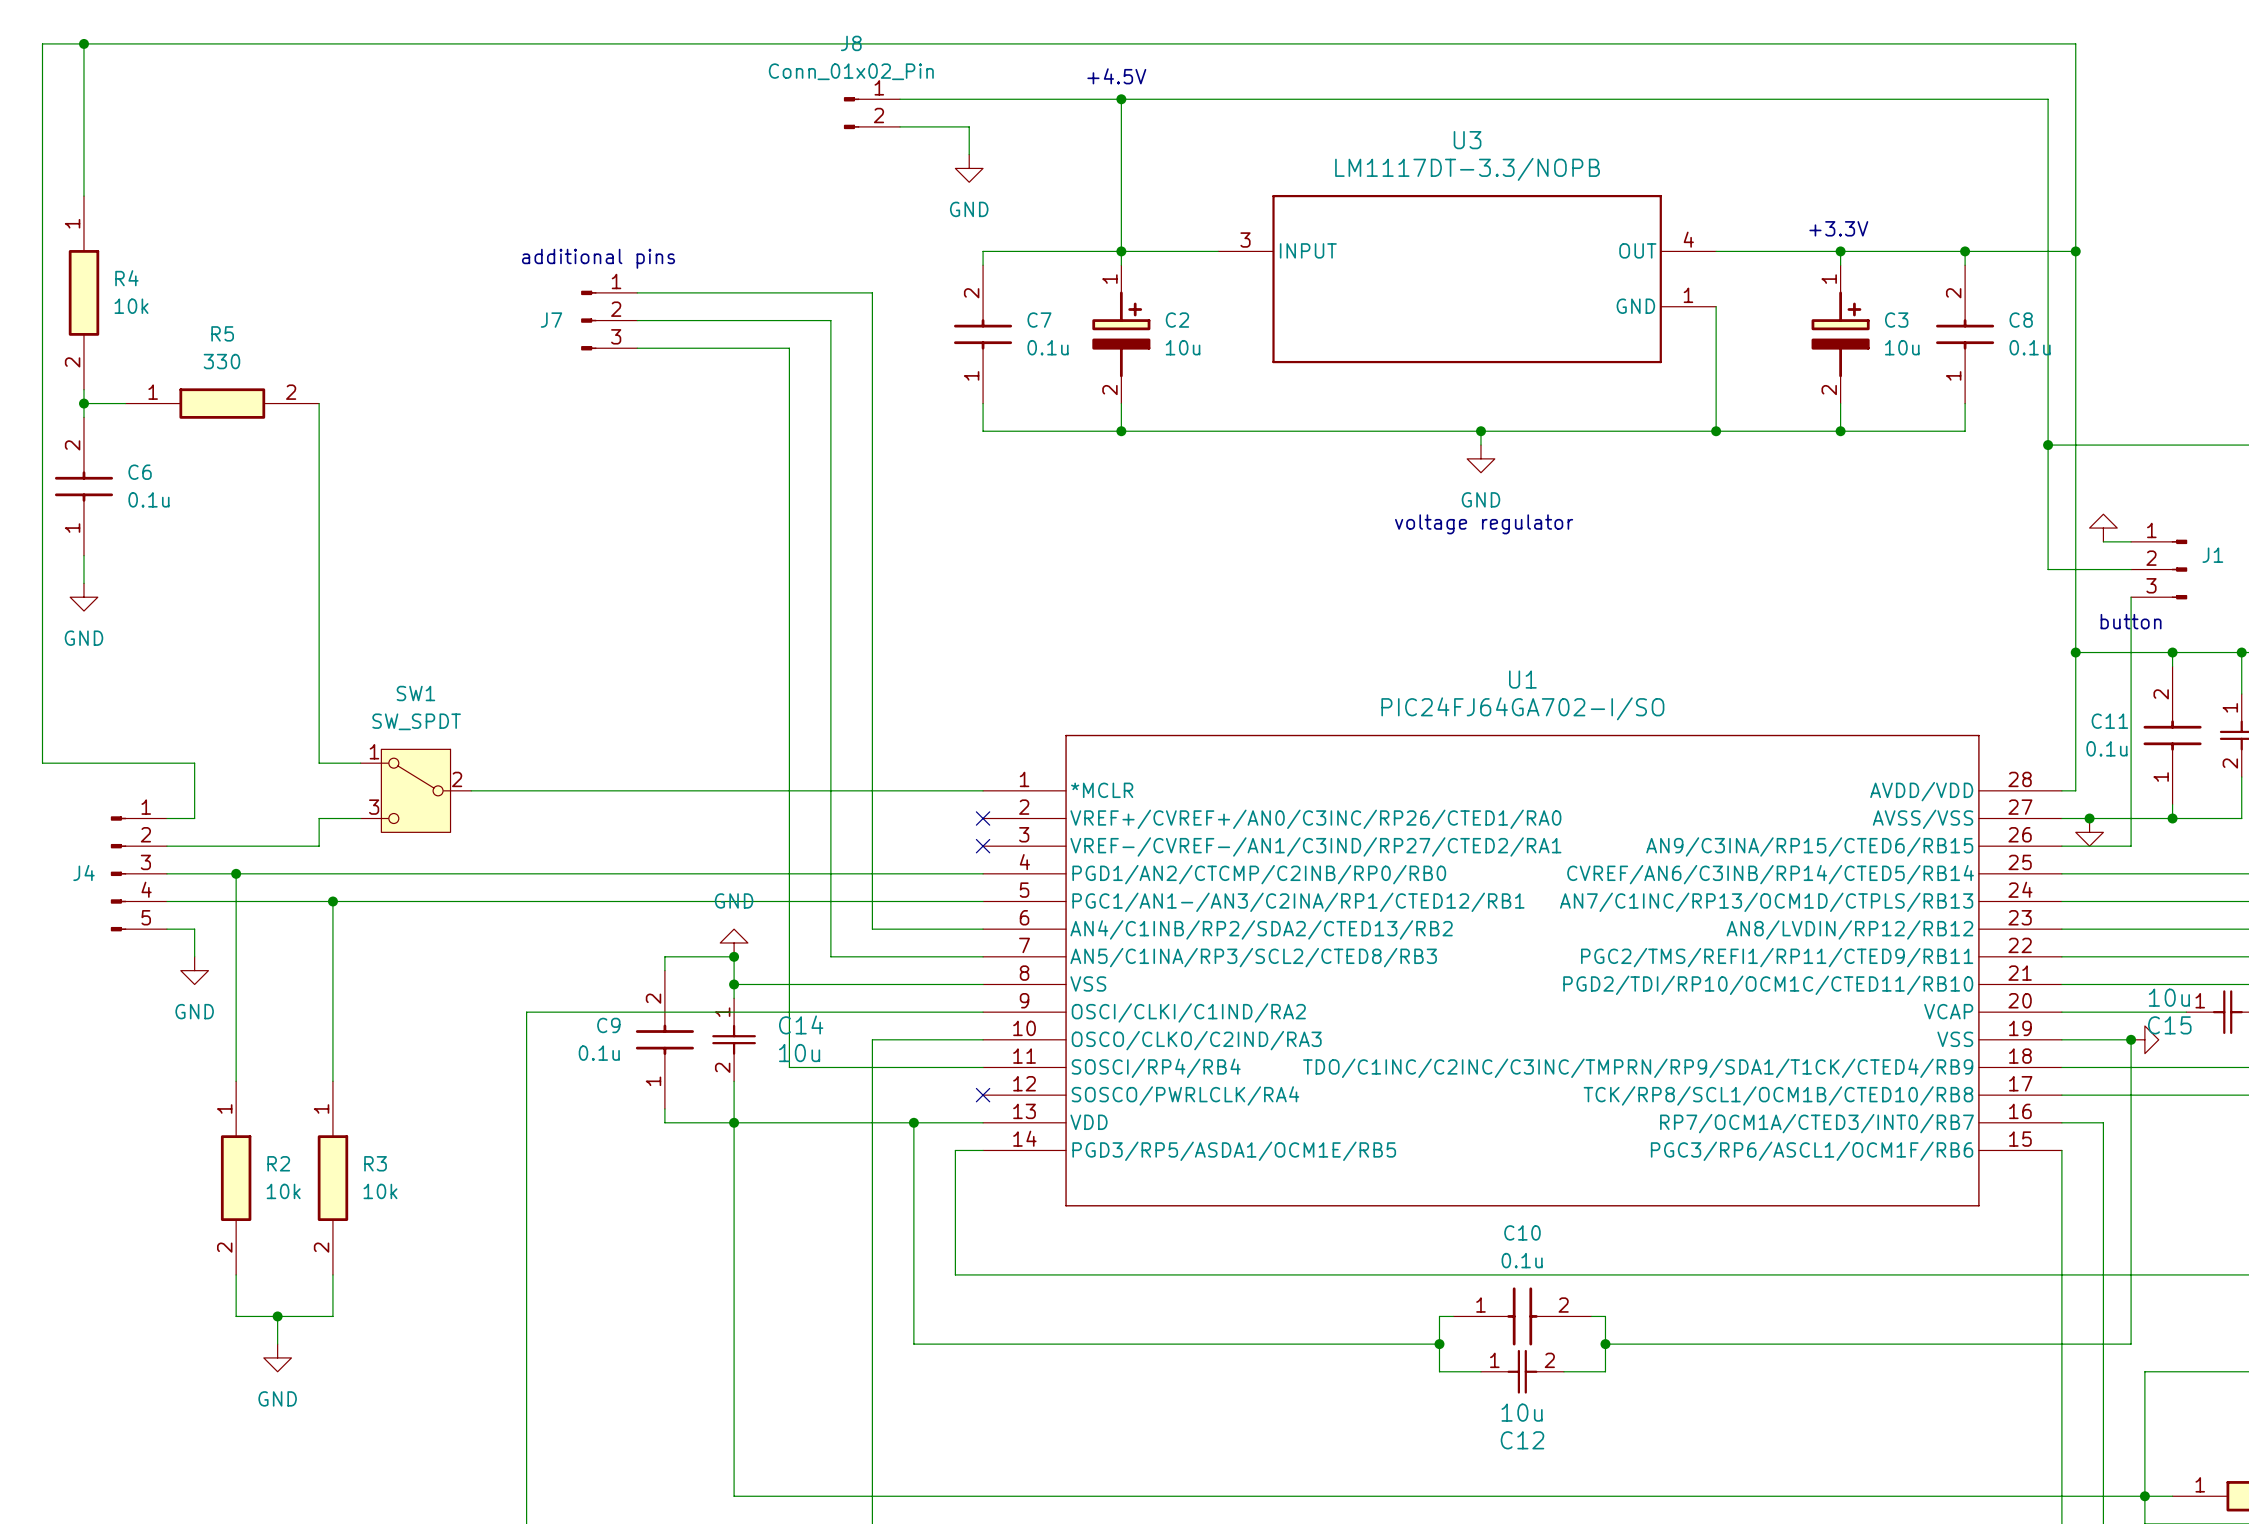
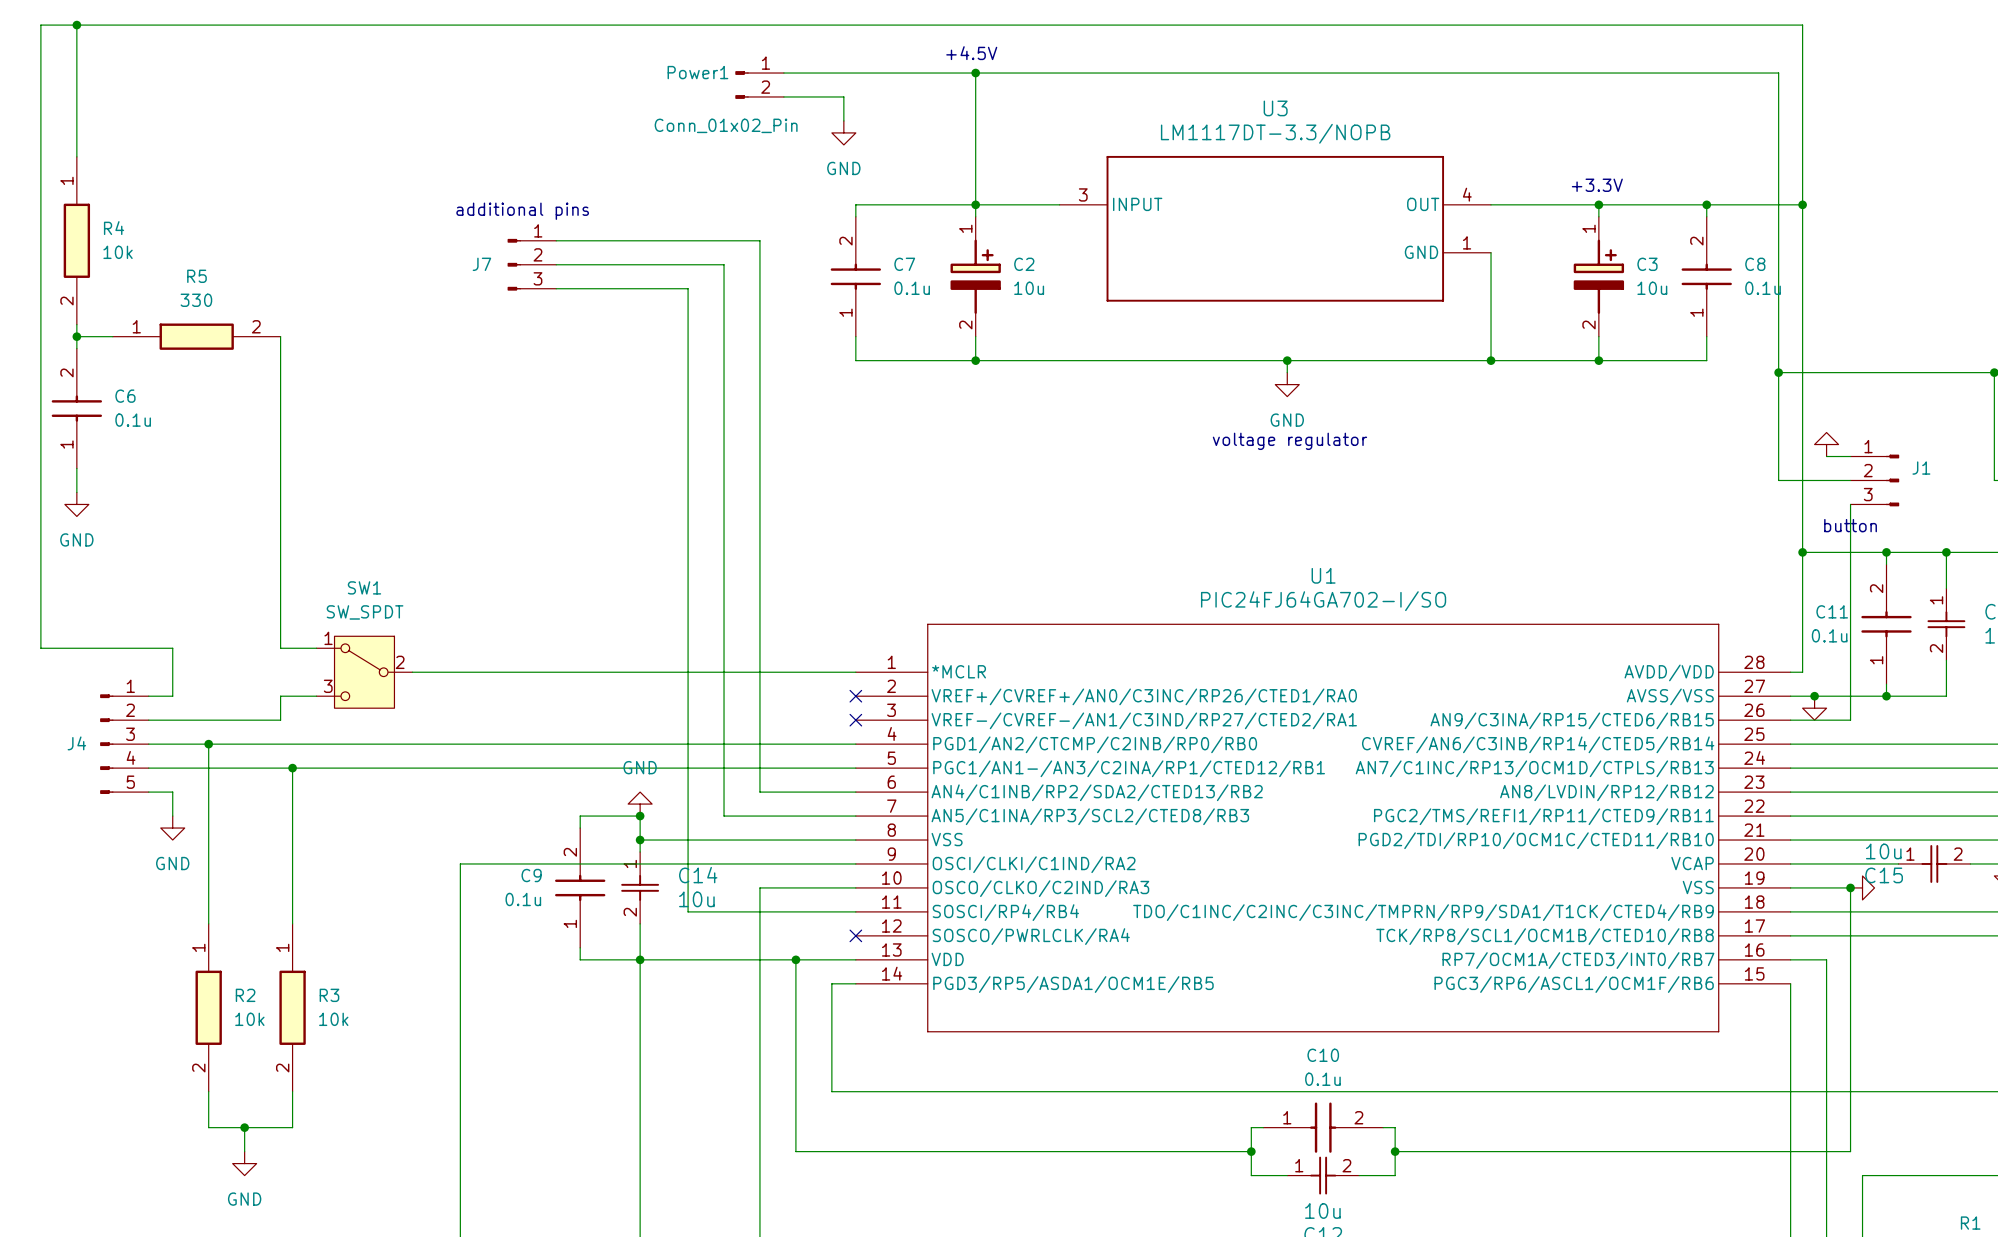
J8 name: J8 (851, 43) -> Power1 (697, 72)
J8 value position: Conn_01x02_Pin (851, 71) -> Conn_01x02_Pin (726, 125)

